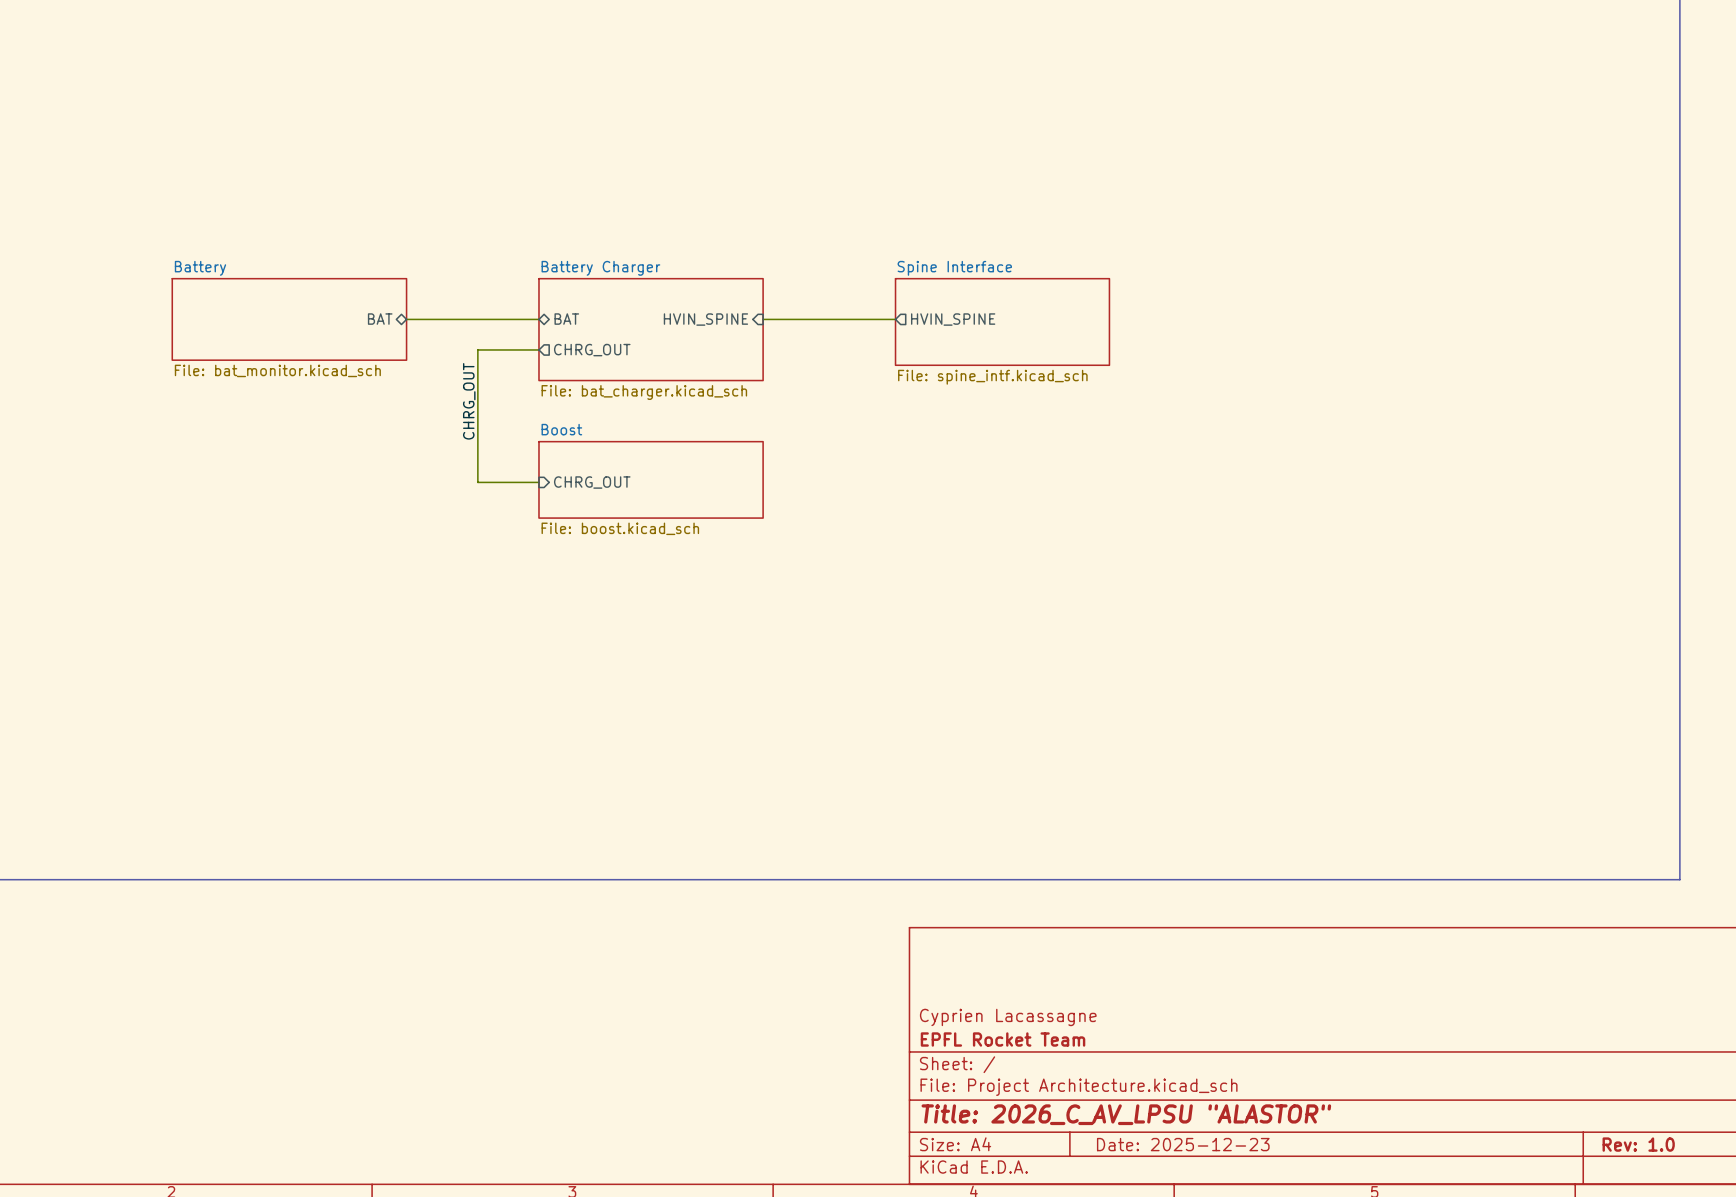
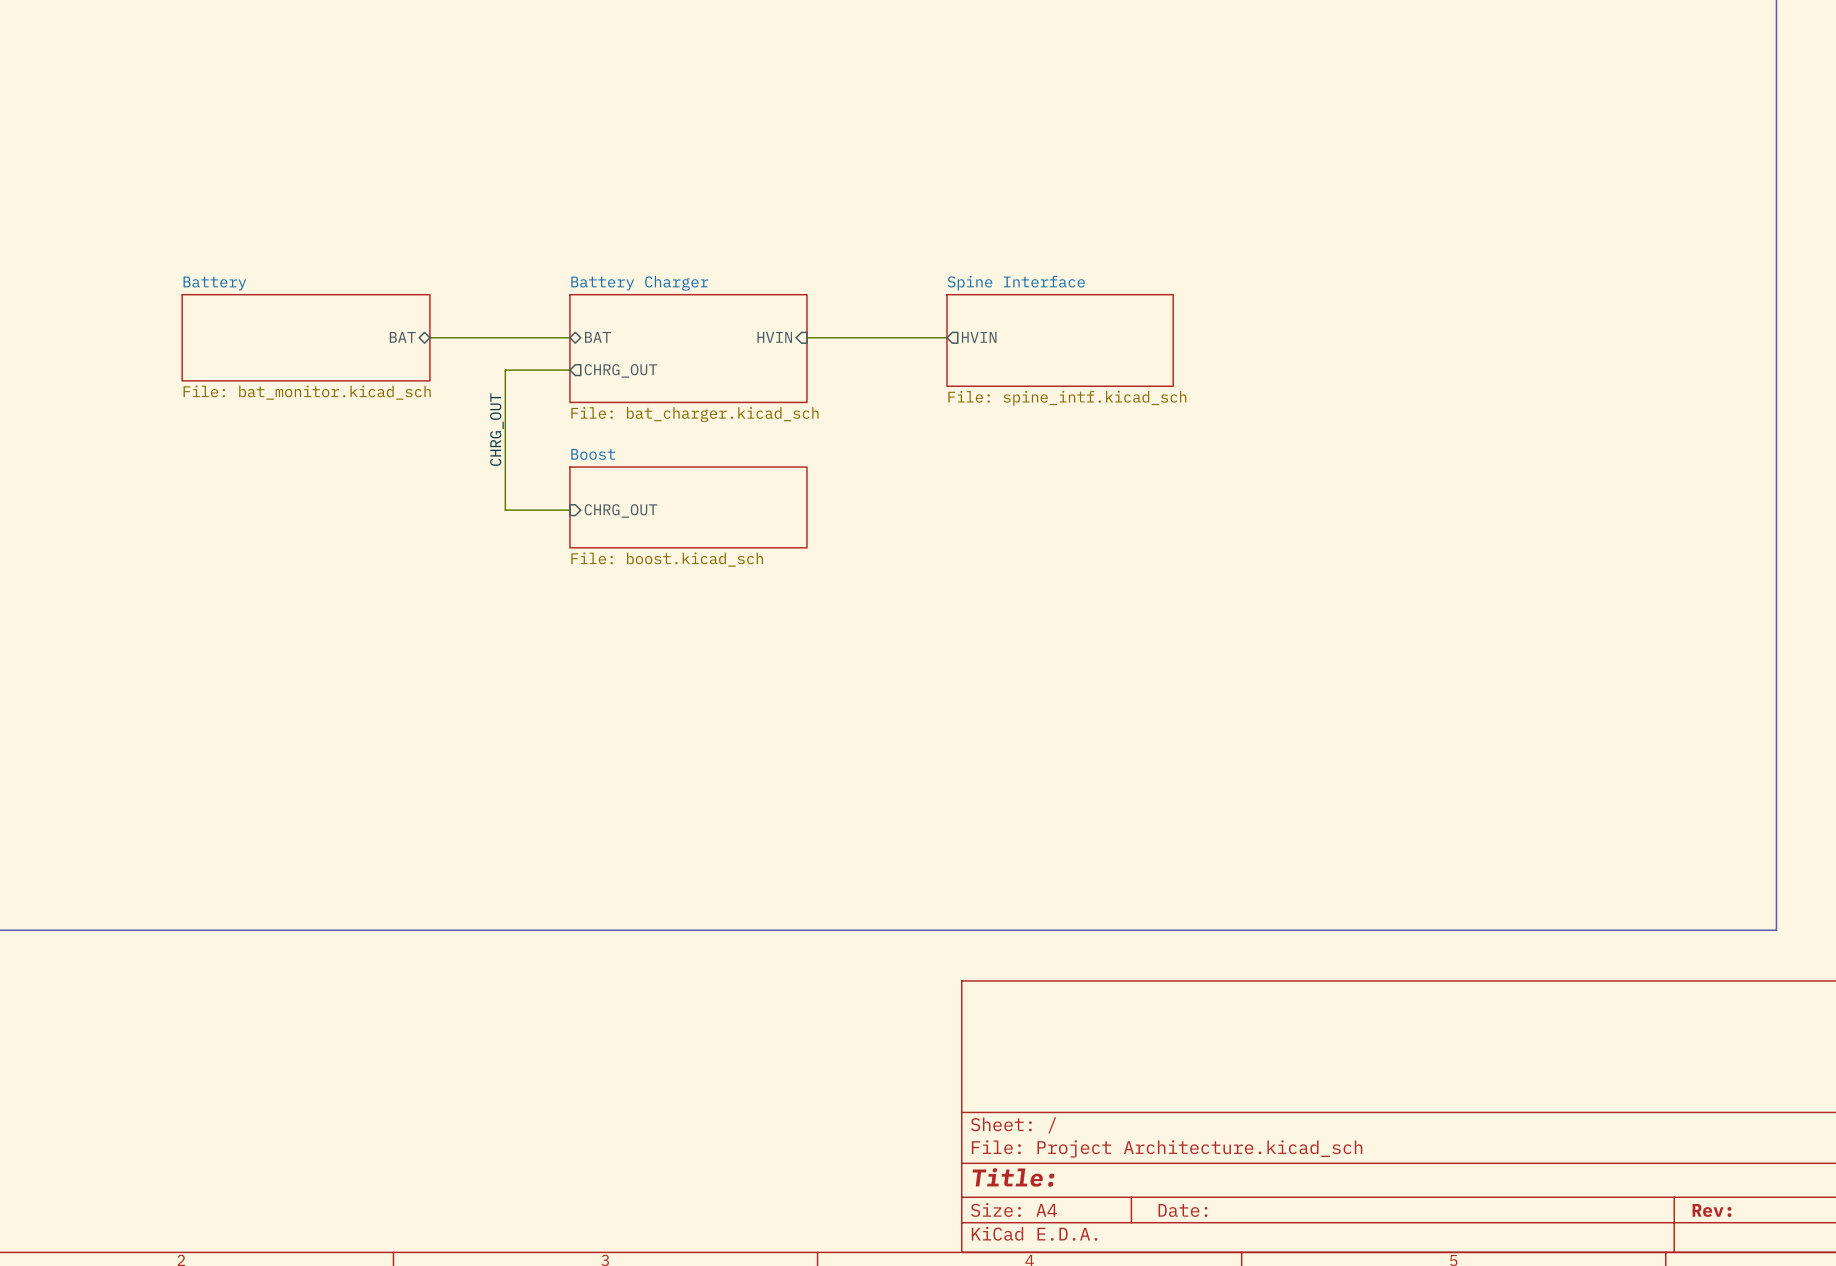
sheet pin: HVIN_SPINE (705, 319) -> HVIN (774, 337)
sheet pin: HVIN_SPINE (953, 319) -> HVIN (979, 337)
title block: Cyprien Lacassagne (1008, 1017) -> none
title block: EPFL Rocket Team (1003, 1039) -> none
title block: Title: 2026_C_AV_LPSU "ALASTOR" (1126, 1114) -> Title: (1013, 1177)
title block: Date: 2025-12-23 (1183, 1144) -> Date: (1182, 1210)
title block: Rev: 1.0 (1638, 1144) -> Rev: (1711, 1210)

